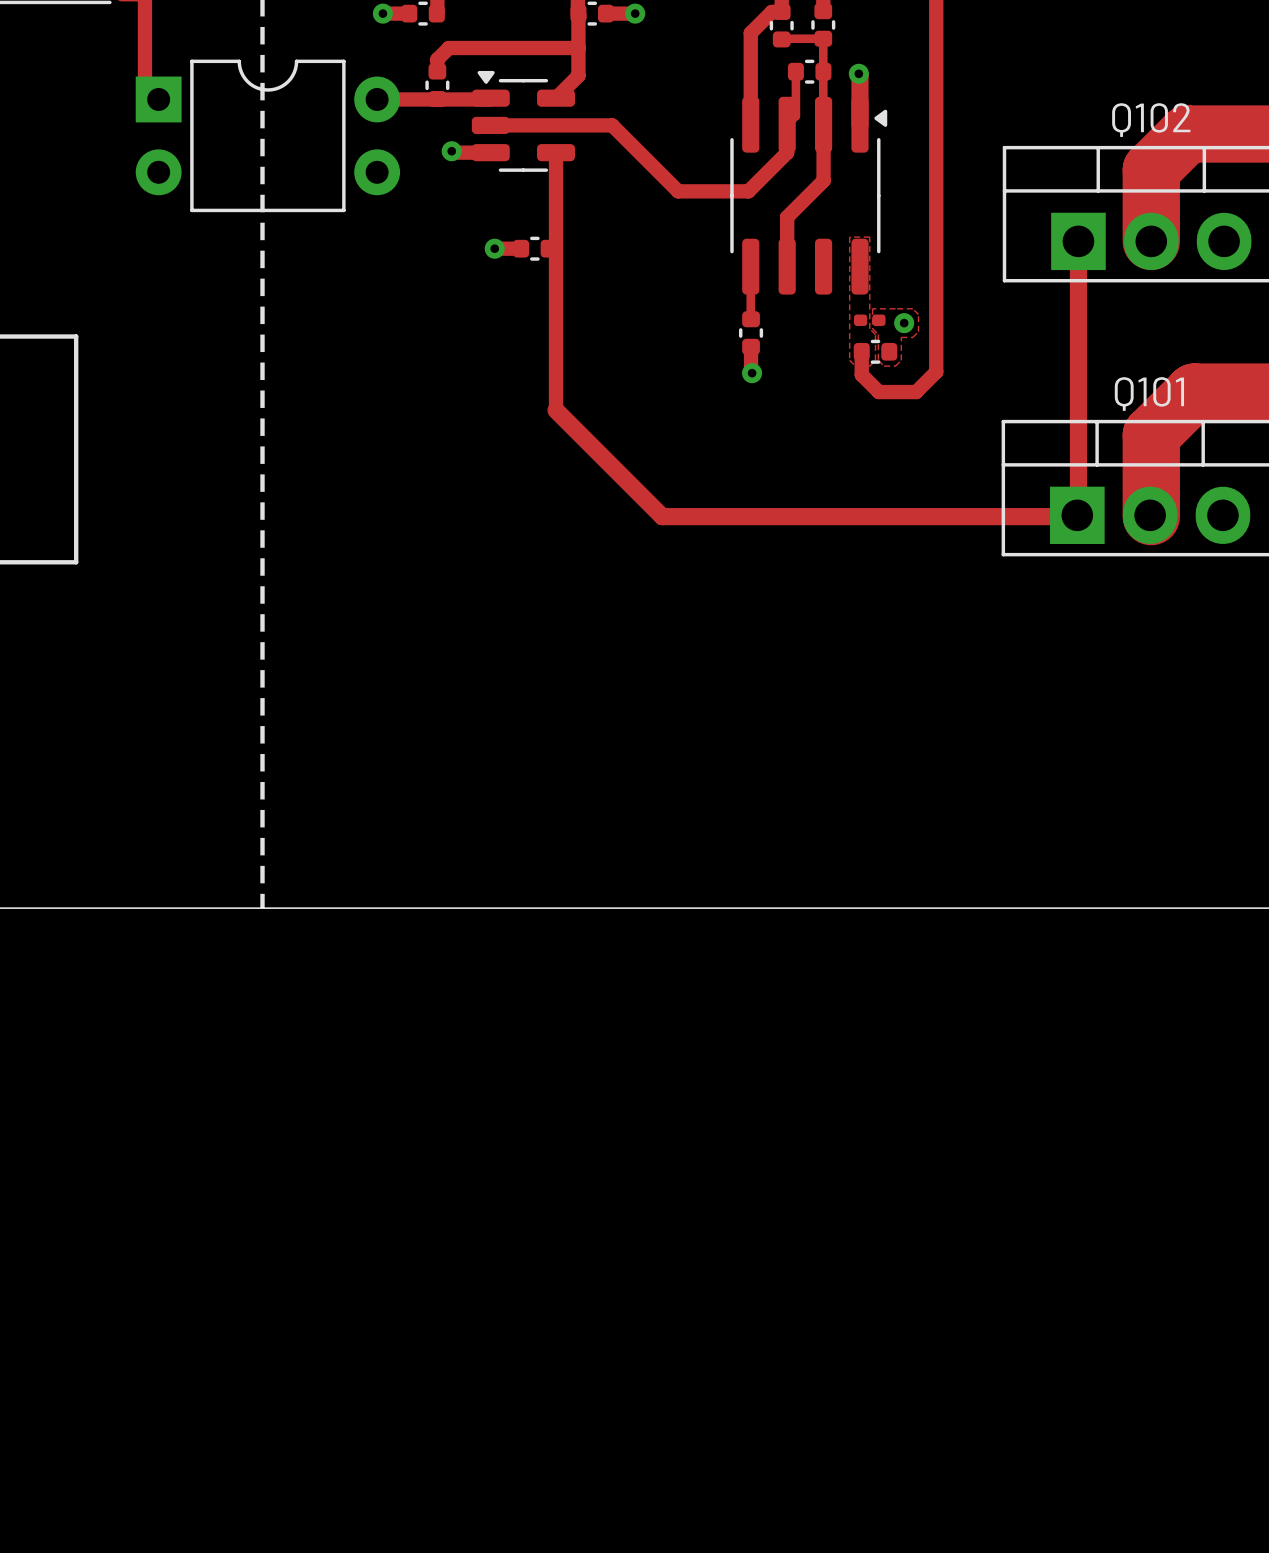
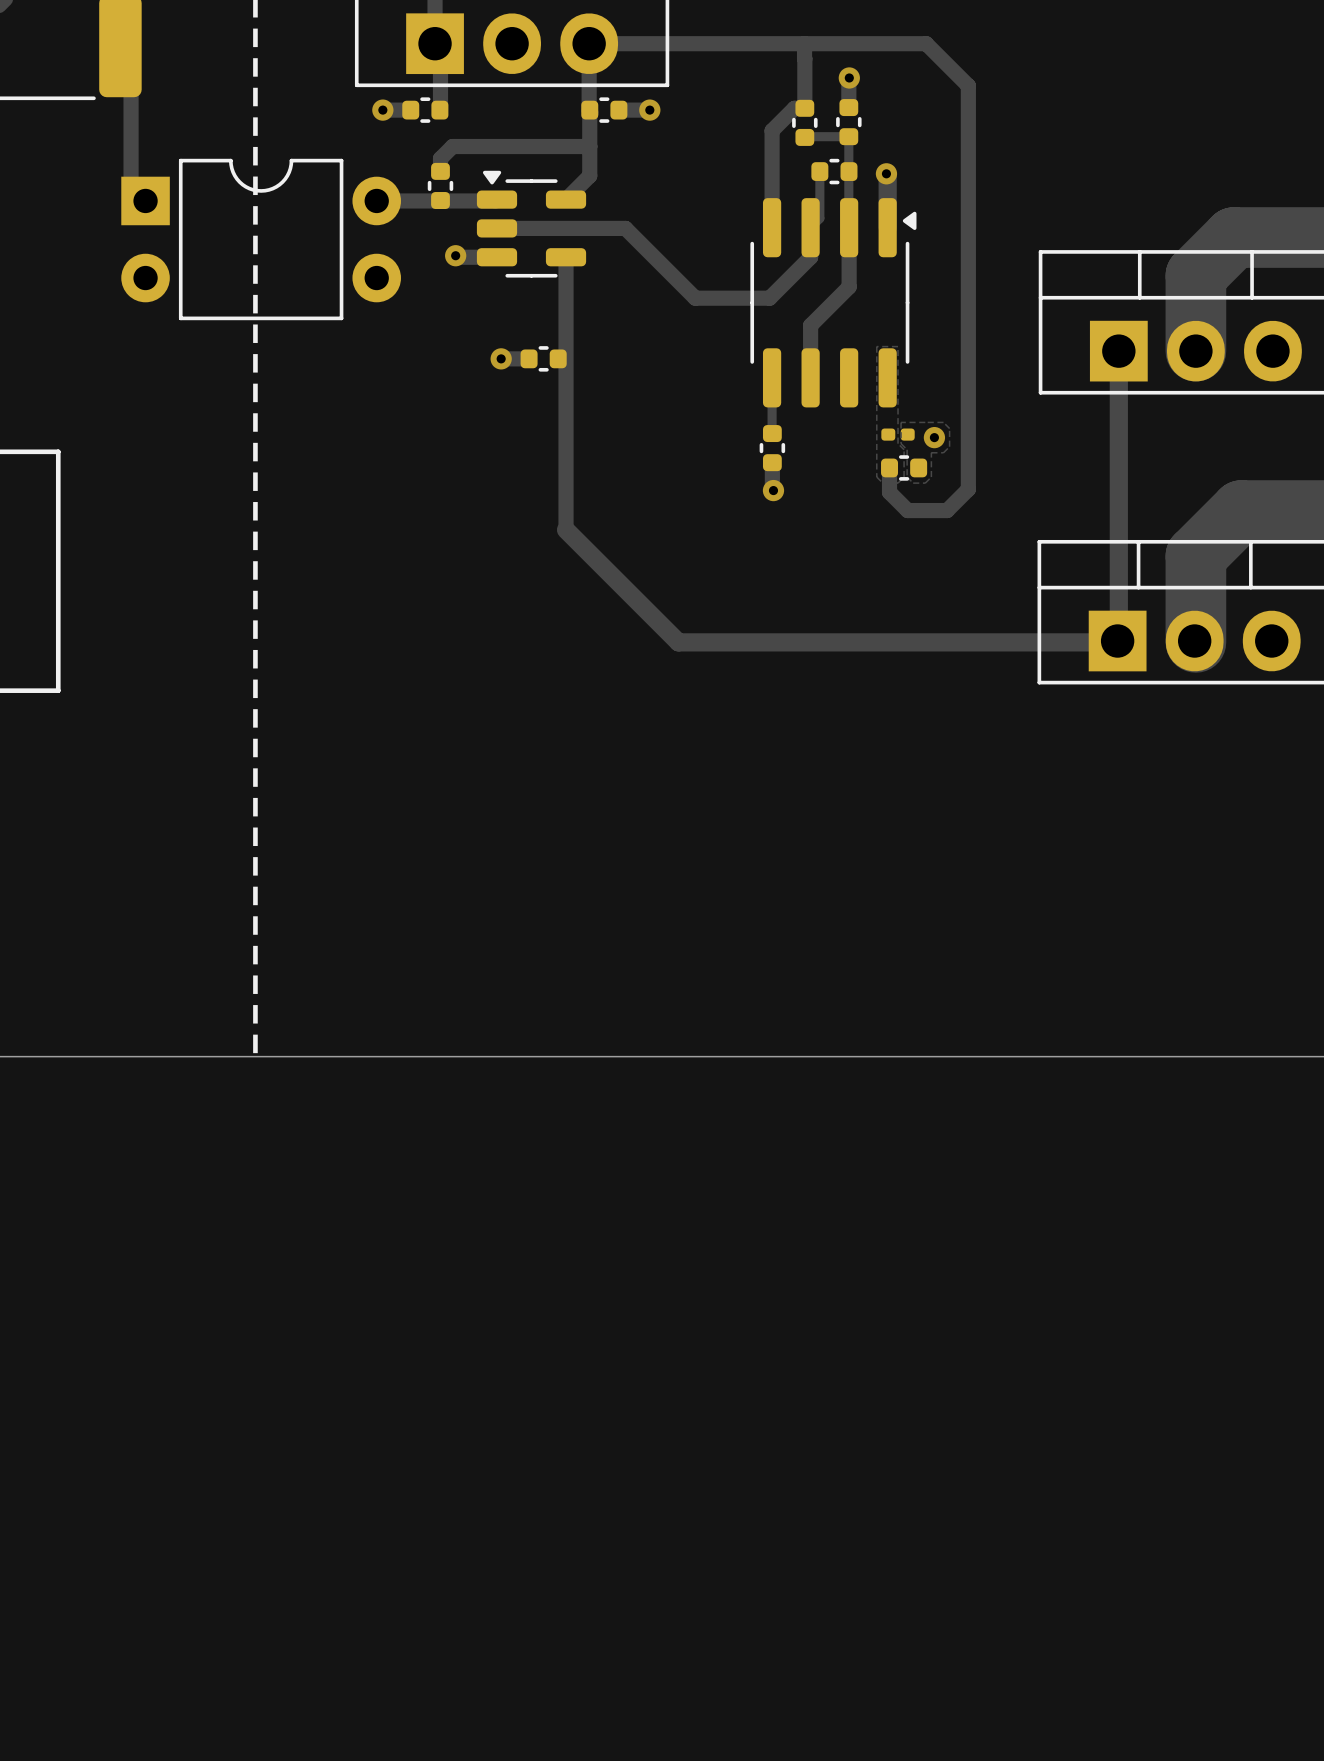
Q102 name: Q102 (1151, 120) -> none
Q101 name: Q101 (1149, 394) -> none

